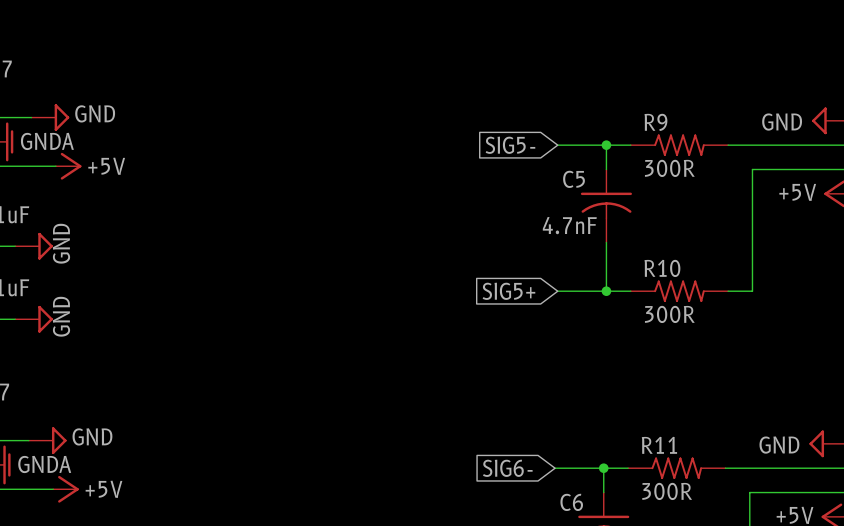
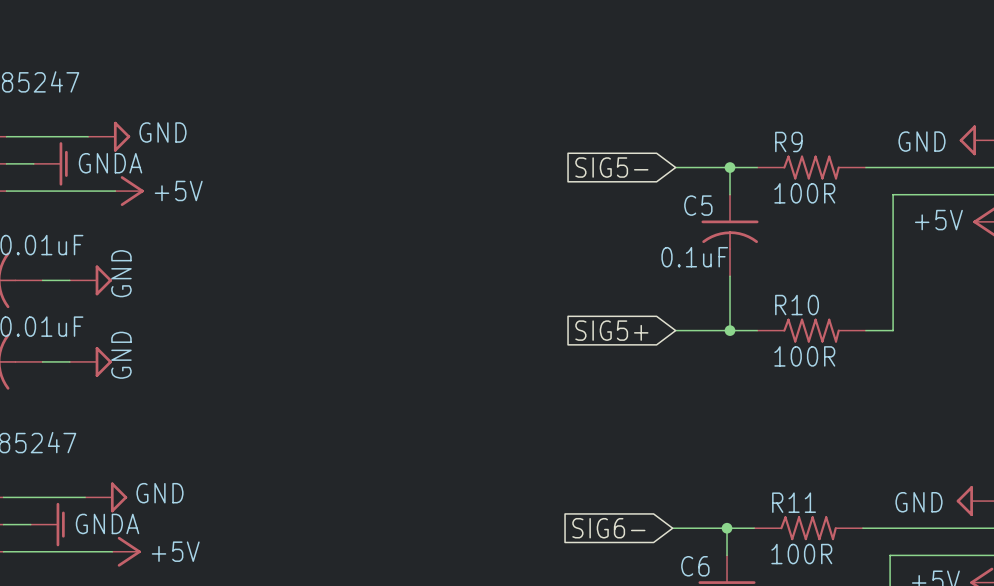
R9 value: 300R (669, 168) -> 100R (804, 193)
C5 value: 4.7nF (569, 225) -> 0.1uF (694, 257)
R10 value: 300R (669, 314) -> 100R (804, 356)
R11 value: 300R (667, 491) -> 100R (801, 554)

